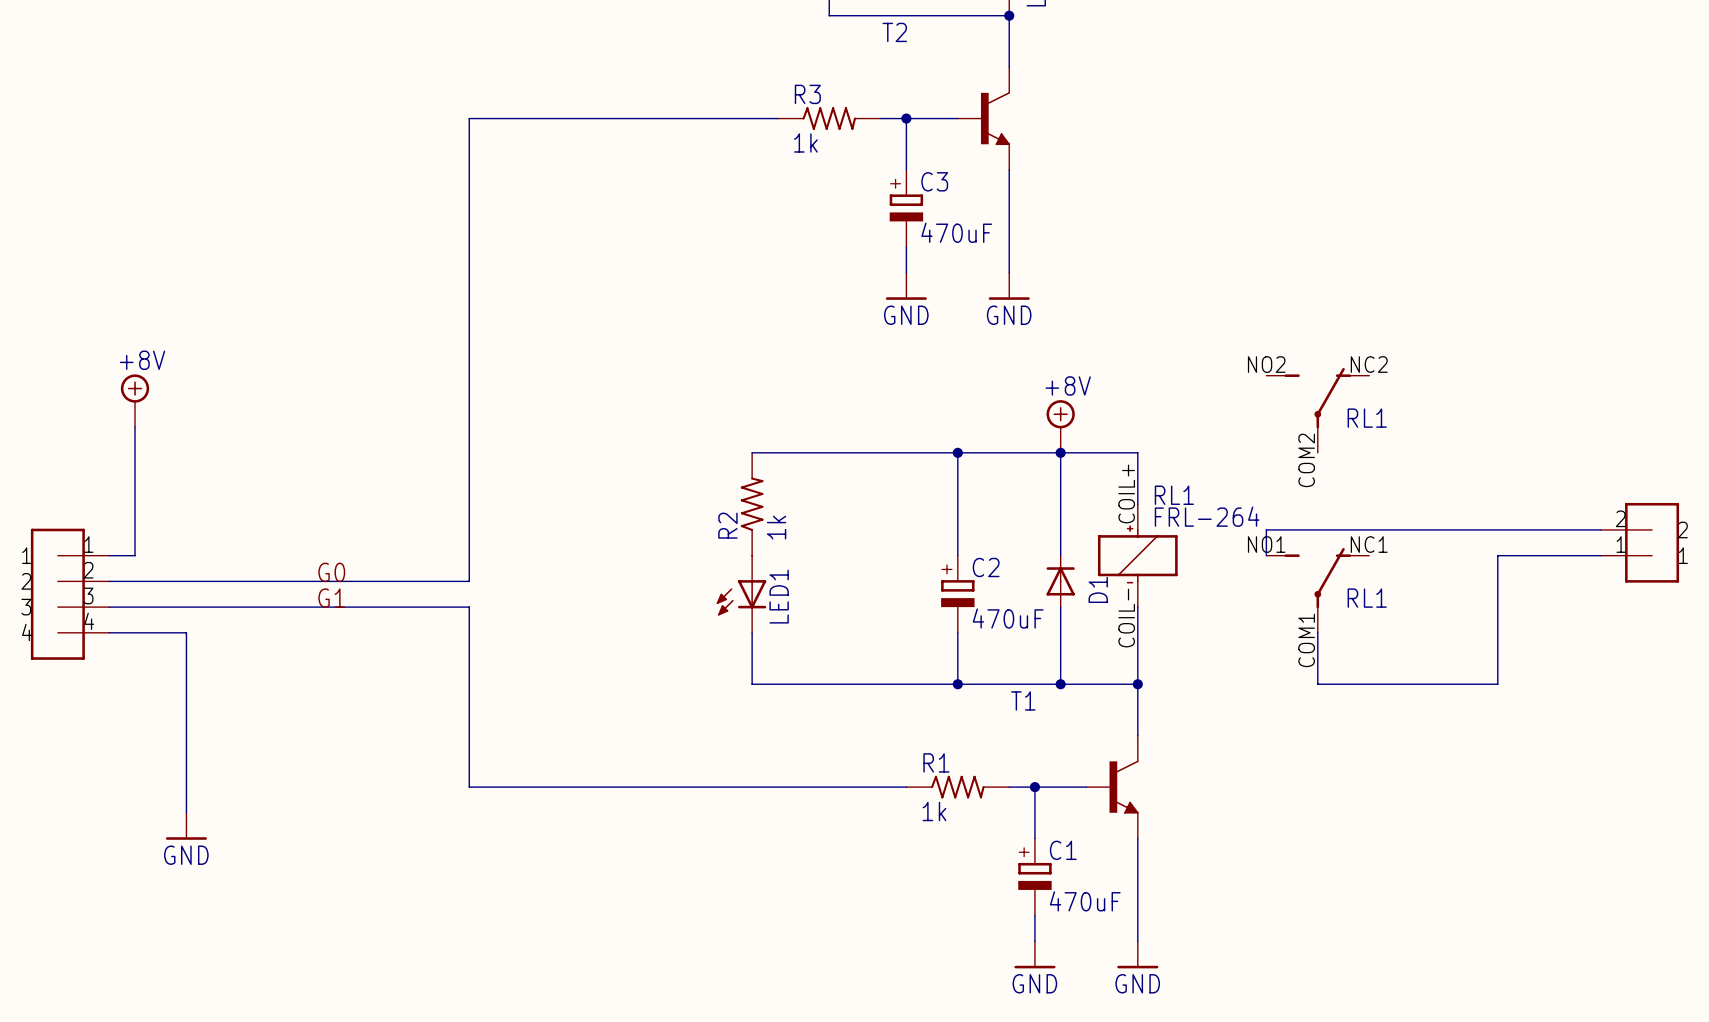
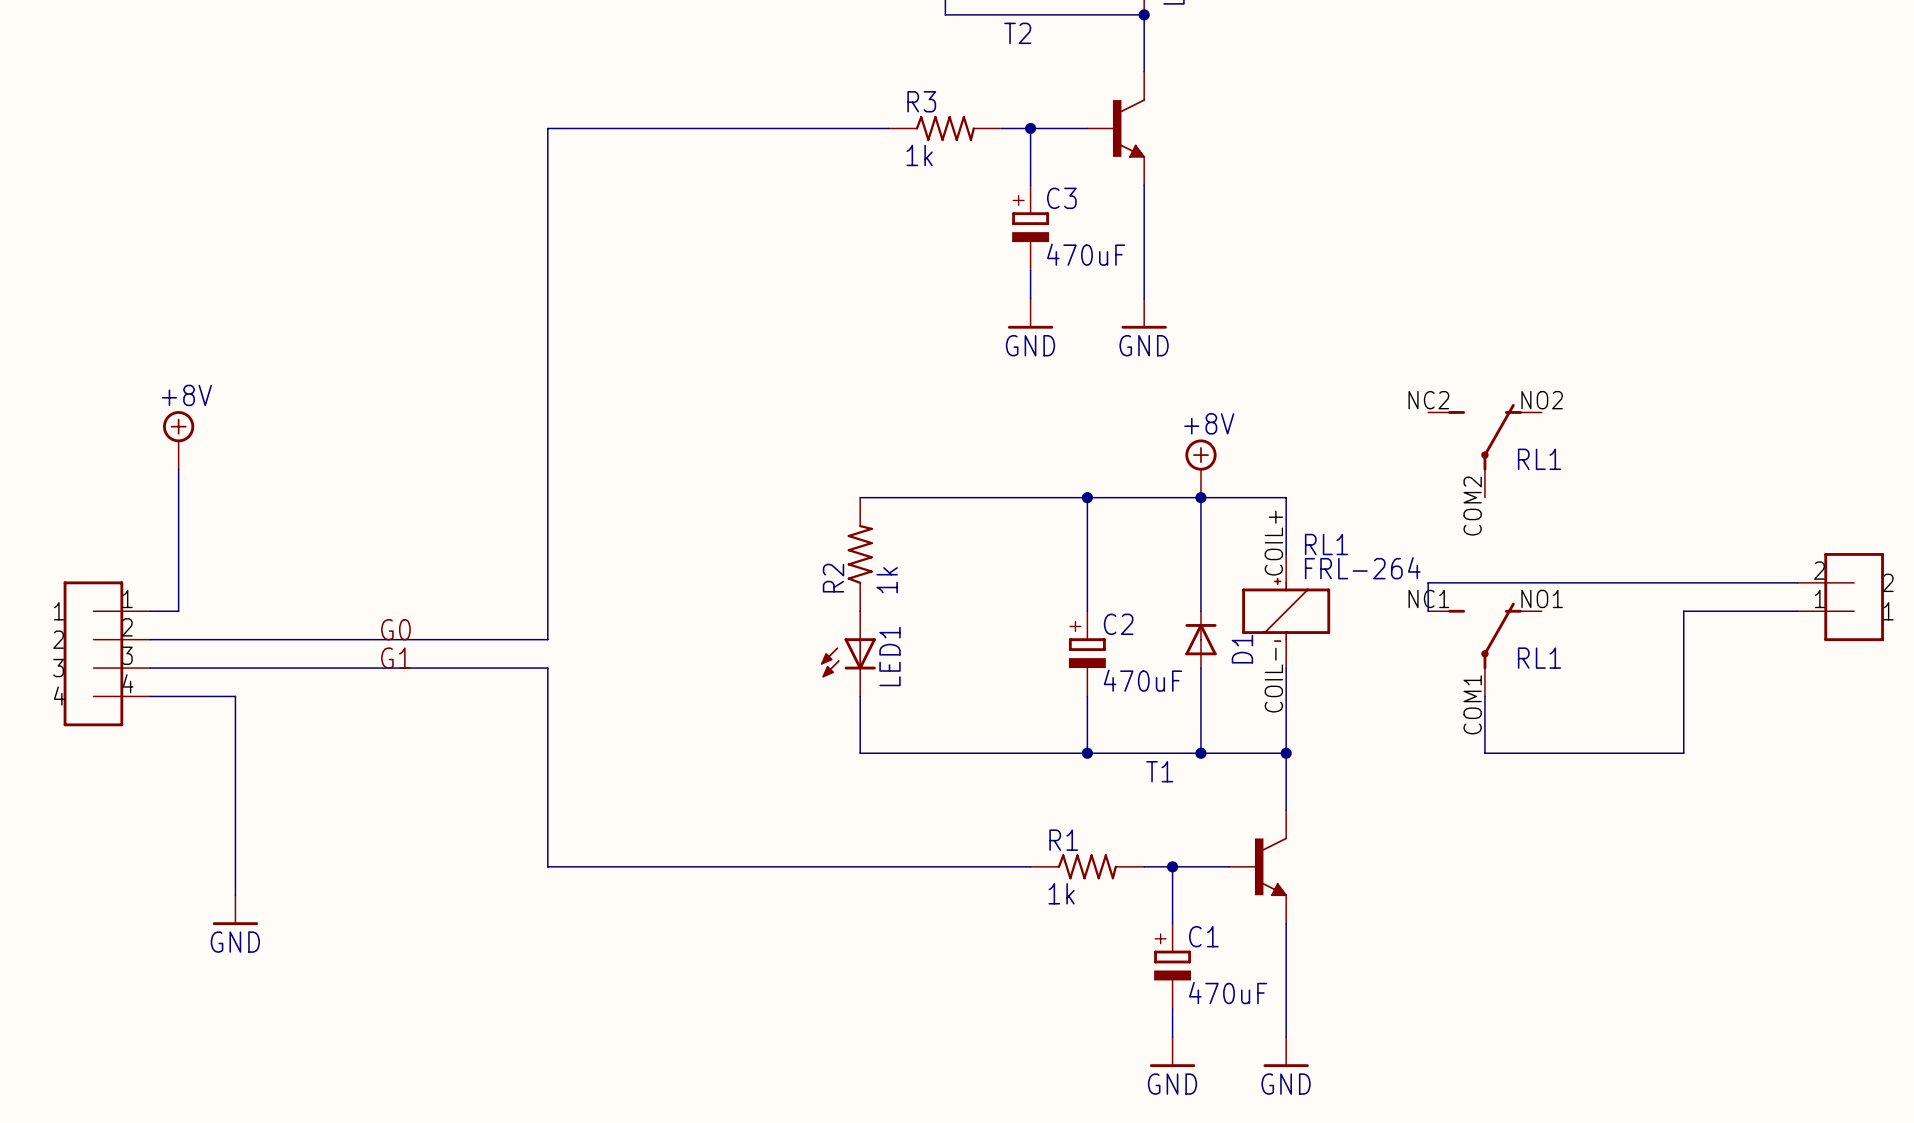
RL1 pin number: NO2 (1266, 364) -> NC2 (1428, 400)
RL1 pin number: NC2 (1369, 364) -> NO2 (1542, 400)
RL1 pin number: NO1 (1266, 544) -> NC1 (1428, 598)
RL1 pin number: NC1 (1369, 544) -> NO1 (1542, 598)

